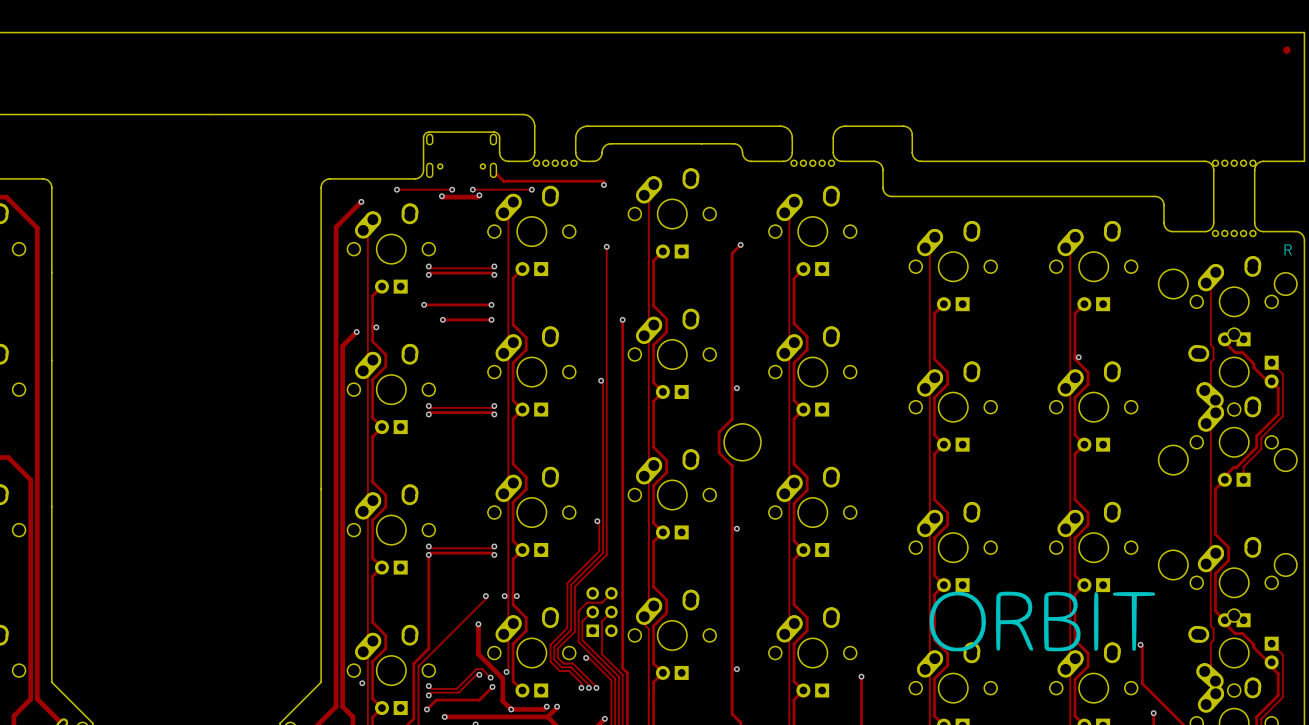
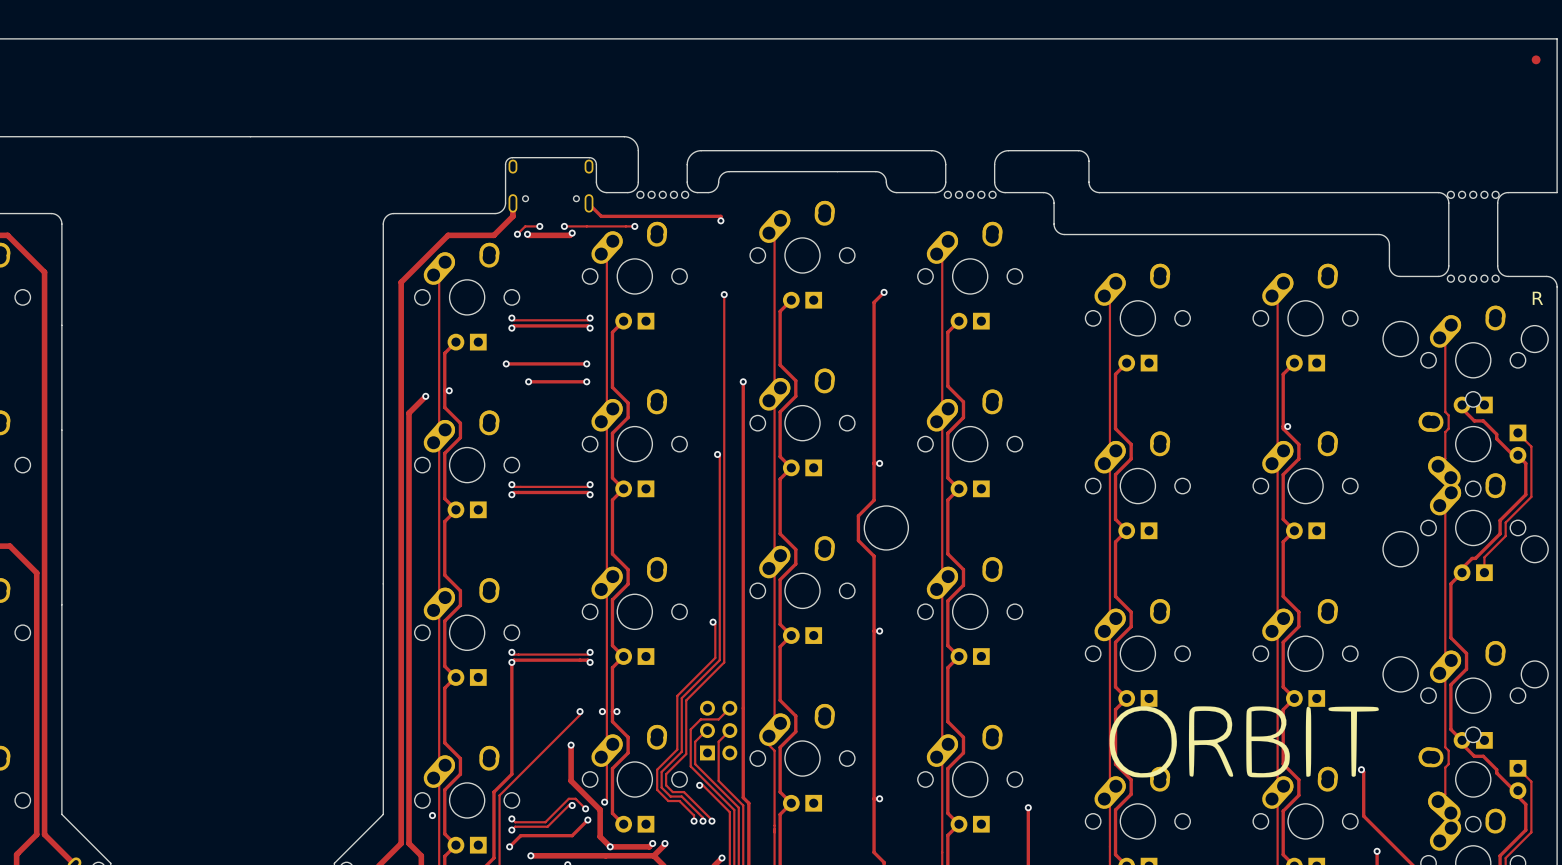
track: (396, 189) (440, 189) -> (517, 234) (525, 226)
via: (396, 189) -> none
via: none -> (517, 234)
track: (361, 201) (336, 227) (336, 236) -> (512, 203) (512, 216) (493, 235) (448, 235) (401, 282)
via: (361, 201) -> none

